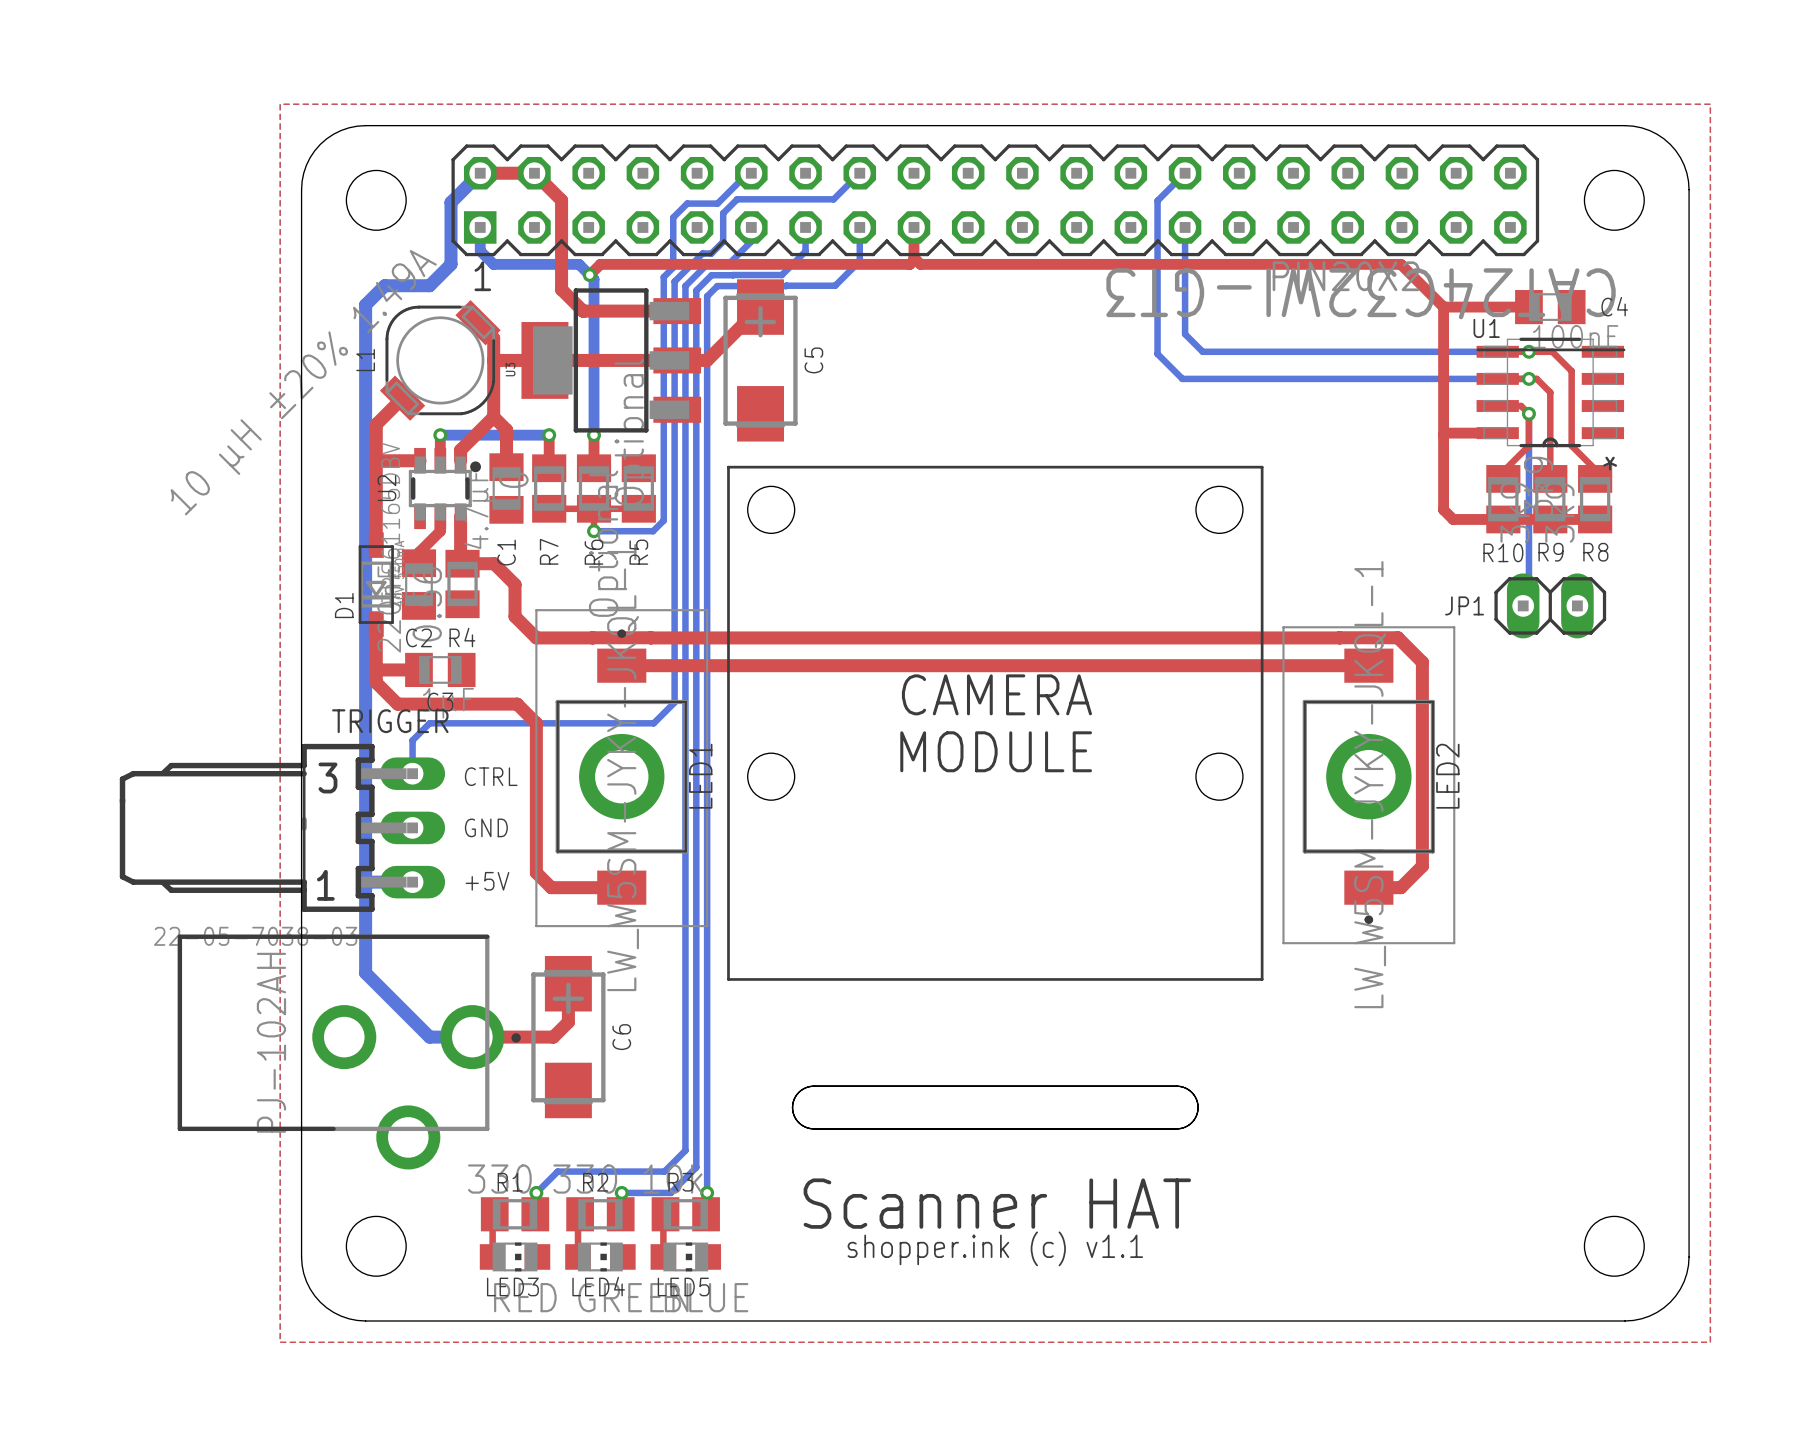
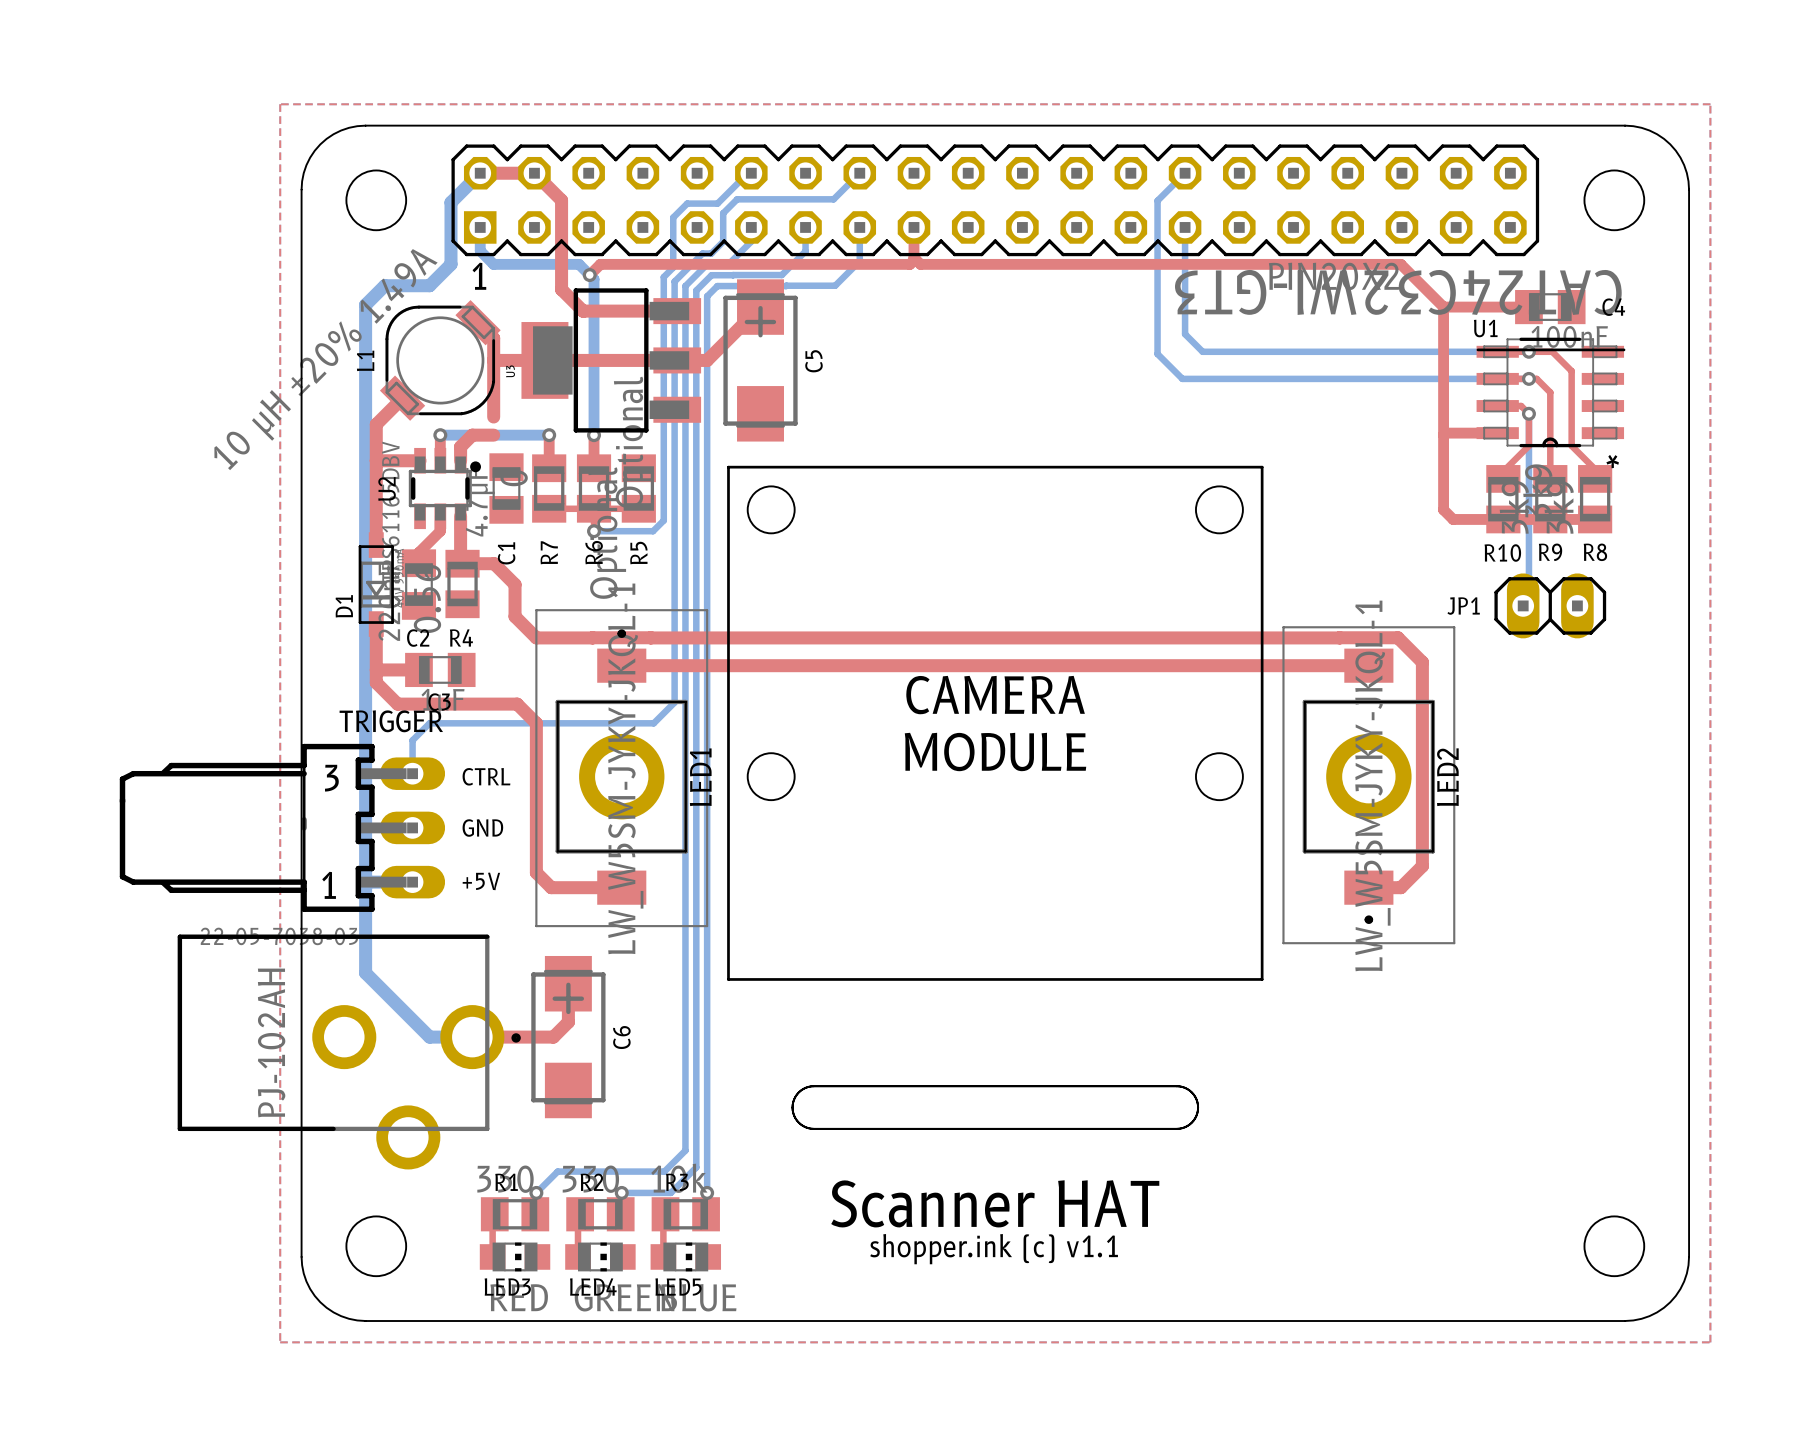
top track: (460, 450) (493, 417) (506, 429) (506, 467) -> (460, 450) (460, 446) (472, 435) (493, 435)

